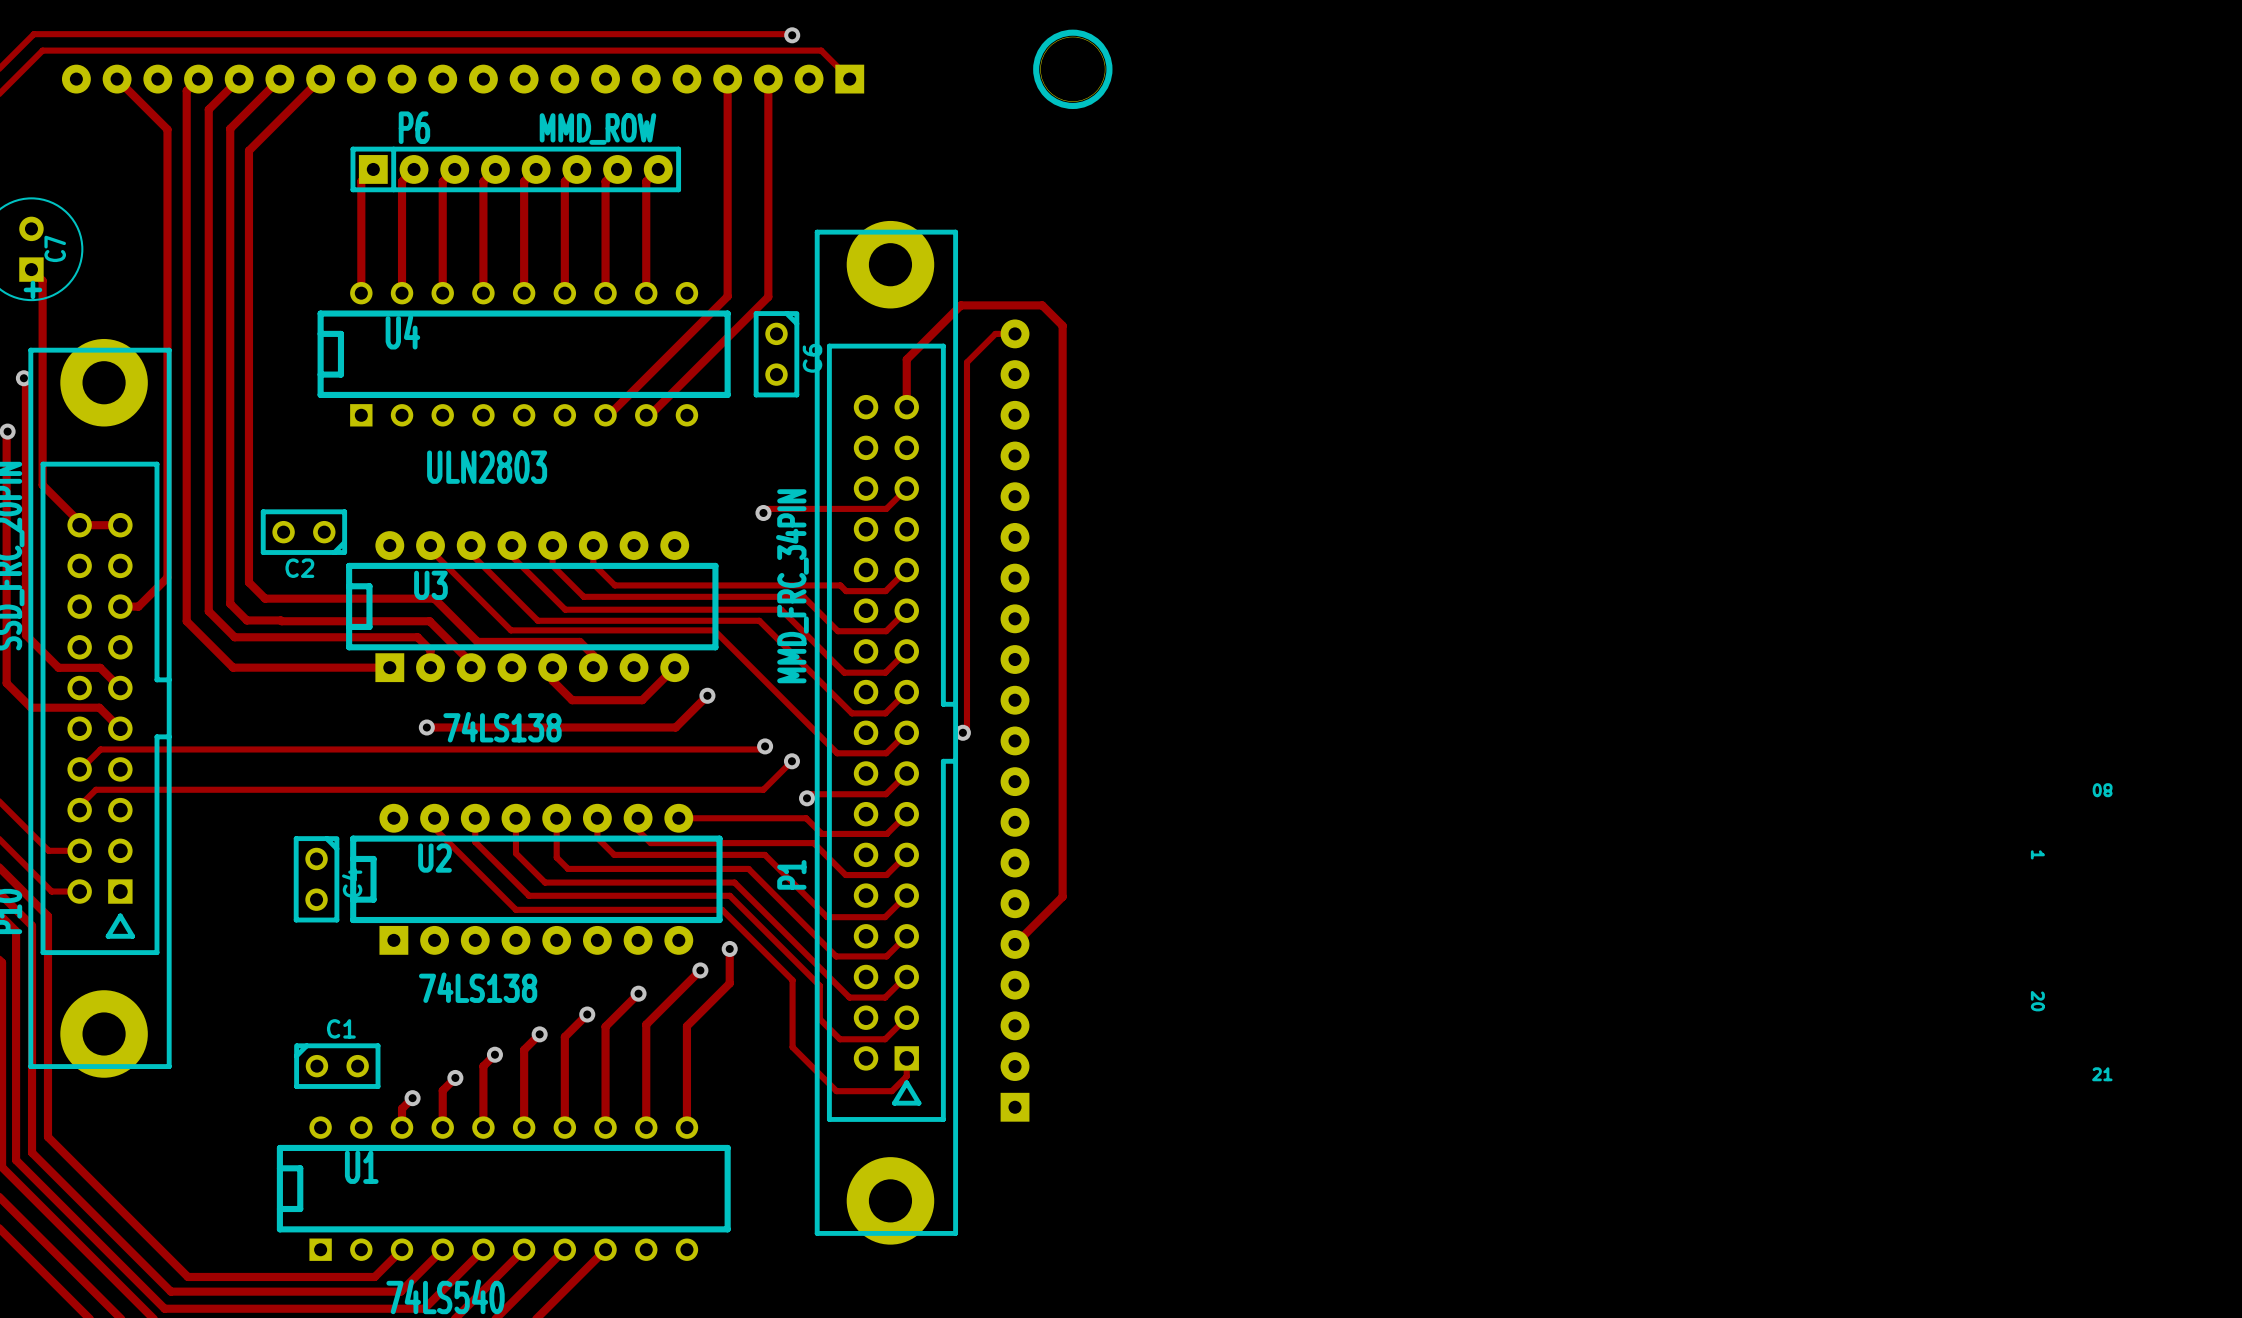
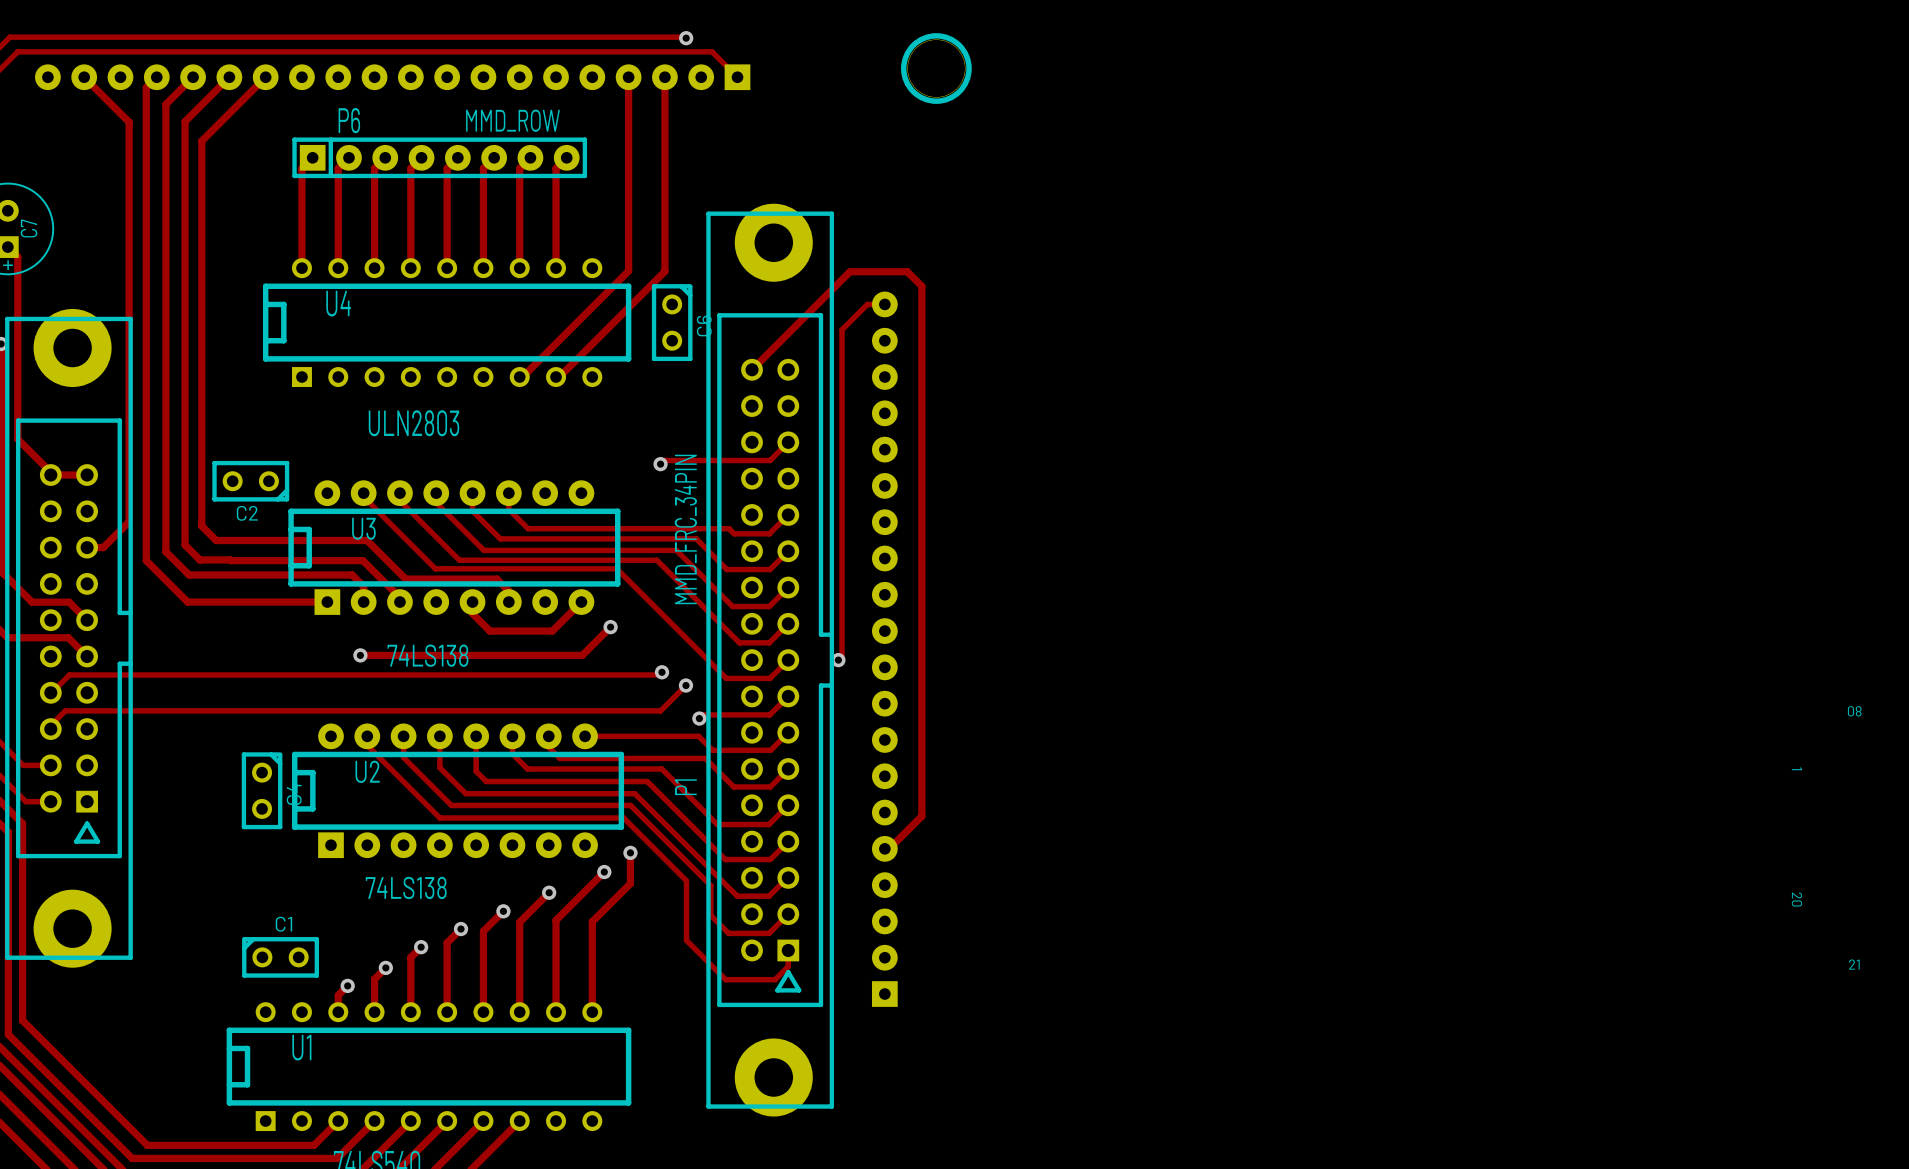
track: (906, 407) (906, 359) (960, 305) (1042, 305) (1062, 325) (1062, 896) (1015, 944) -> (752, 369) (850, 271) (907, 271) (921, 286) (921, 816) (889, 848) (884, 848)

